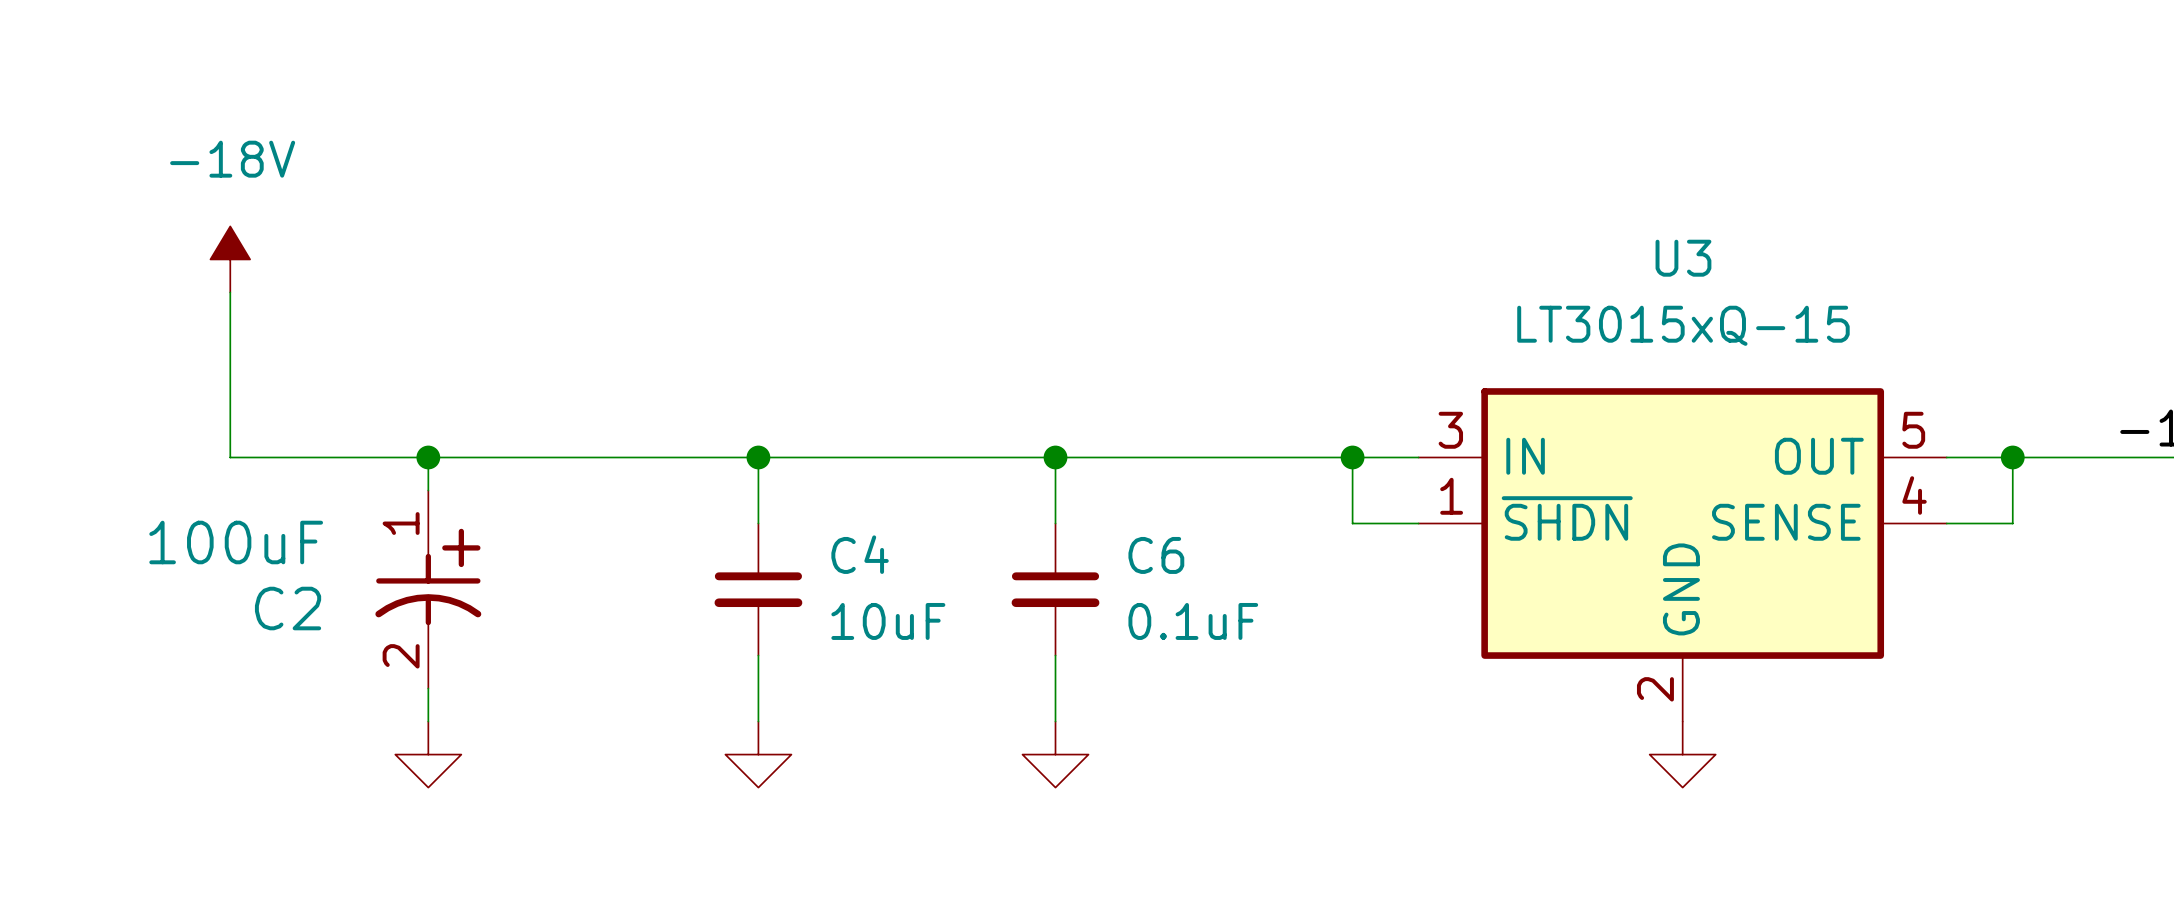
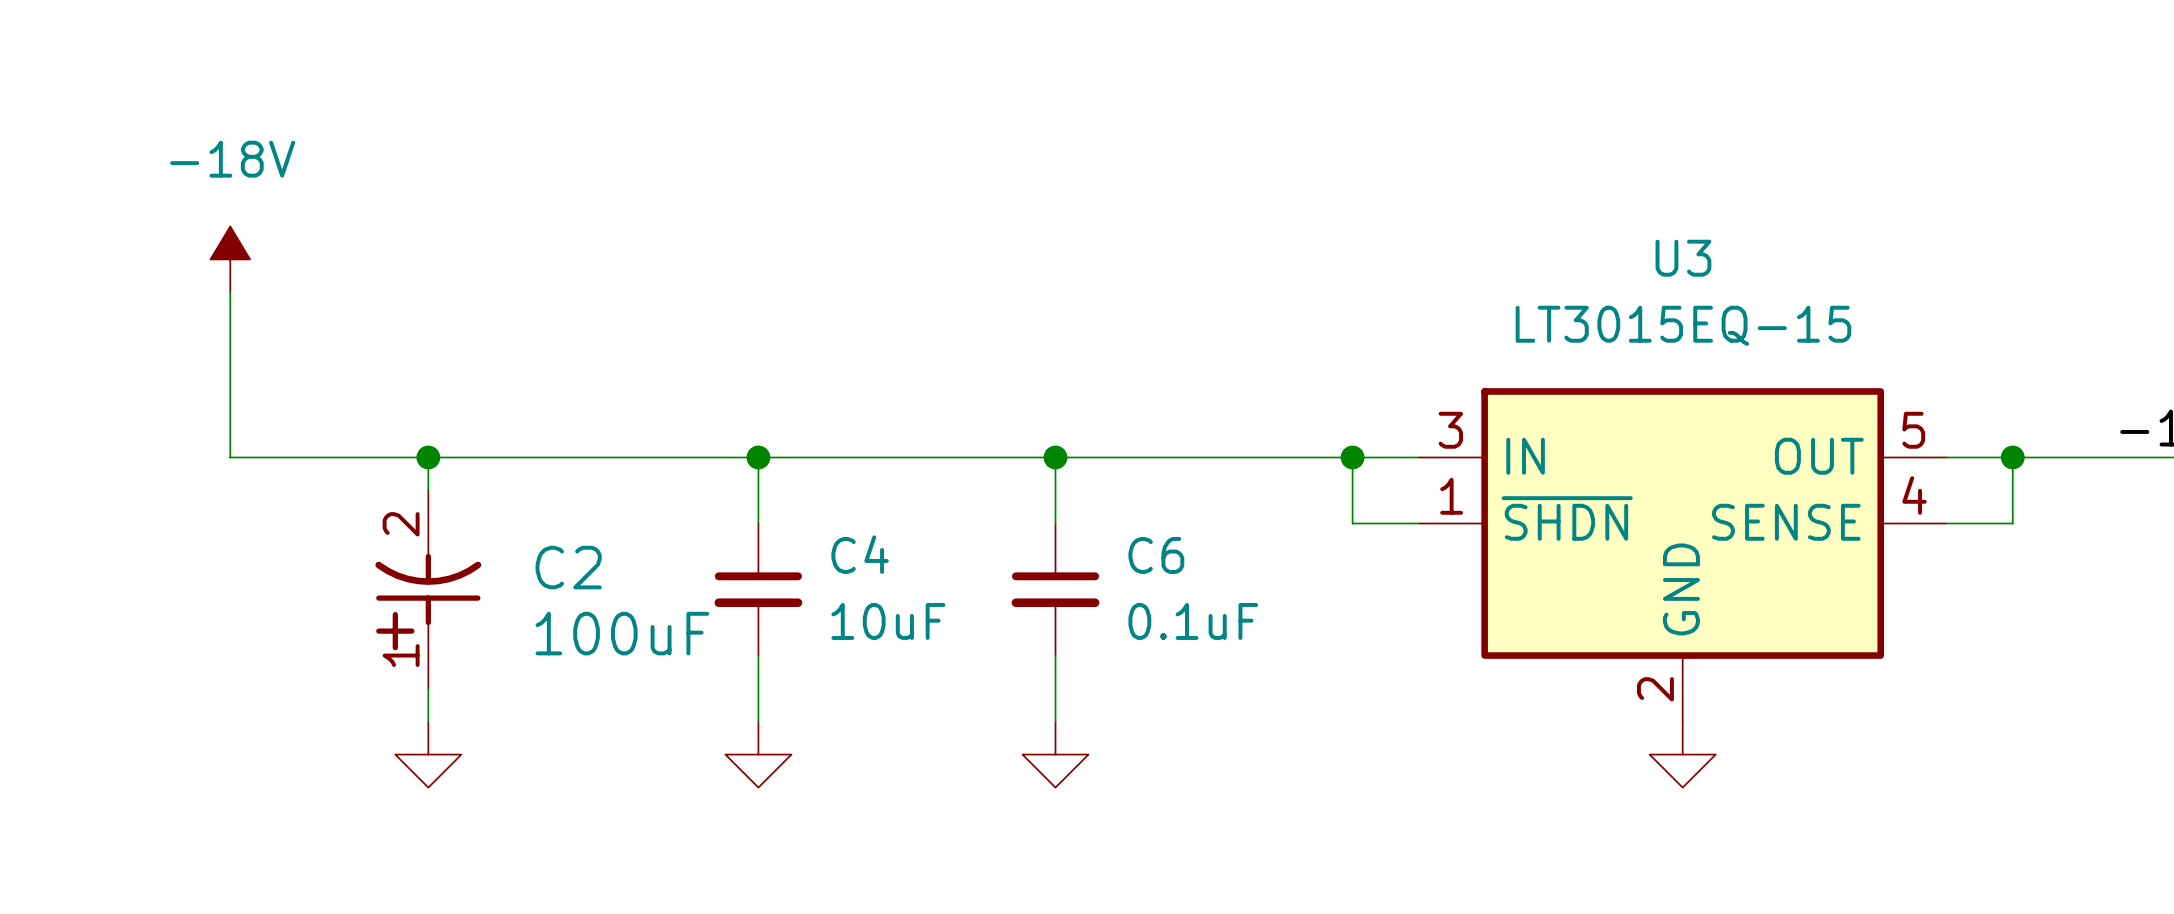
U3 value: LT3015xQ-15 (1683, 325) -> LT3015EQ-15 (1683, 325)
C2 rotation: 0° (428, 576) -> 180° (428, 602)

